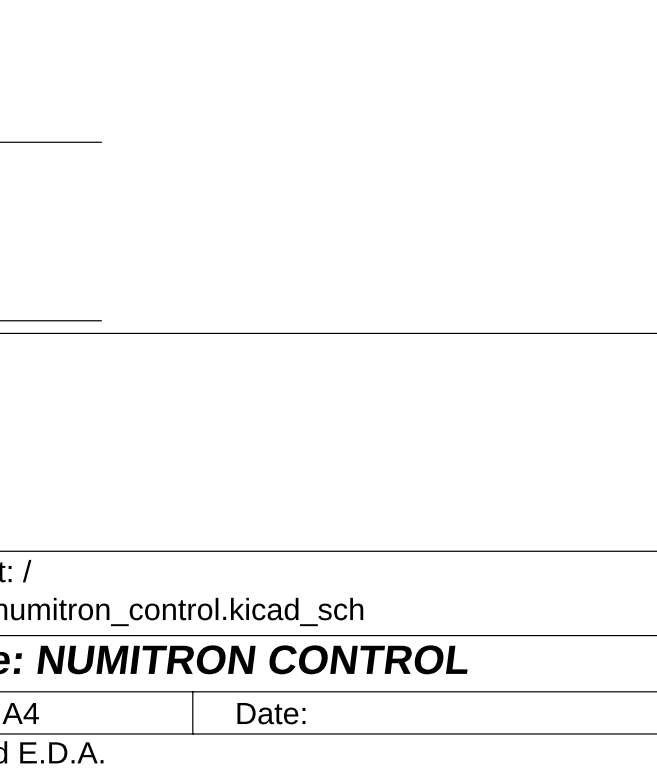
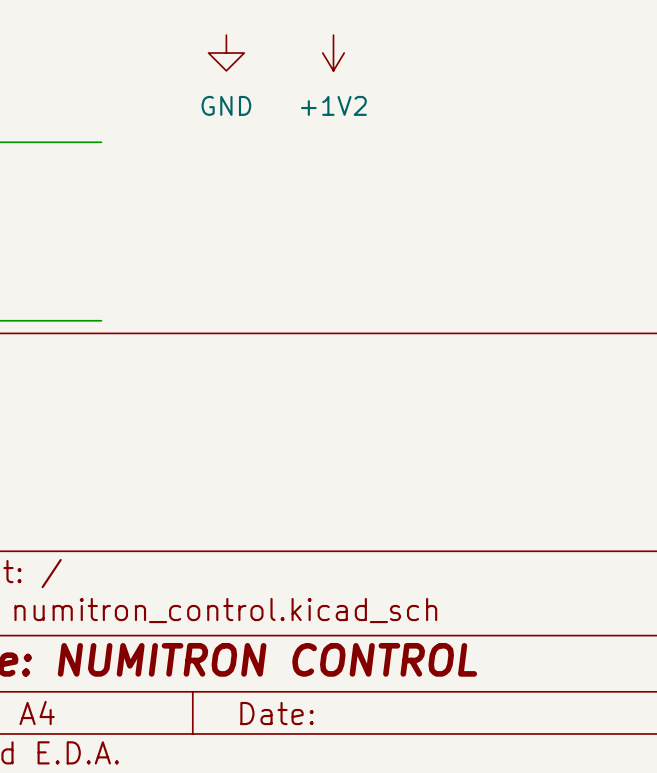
power symbol: none -> GND (226, 53)
power symbol: none -> +1V2 (333, 53)

